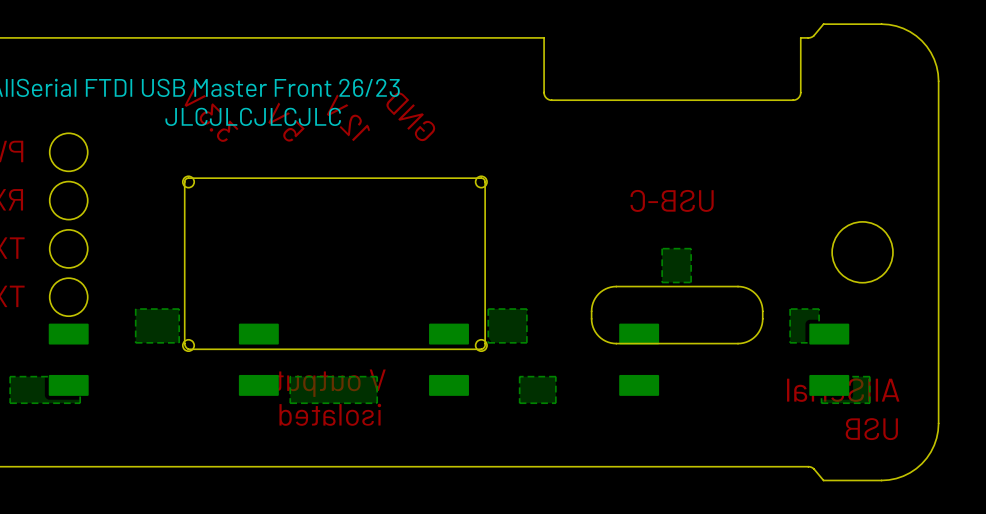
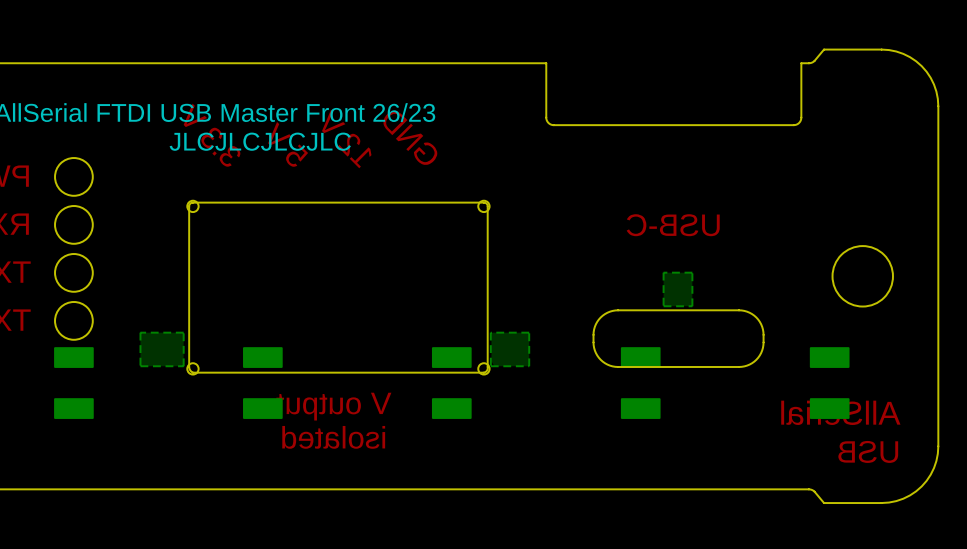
bottom zone outline: (819, 309) (790, 309) (790, 342) (819, 342) (819, 309) -> none
bottom zone outline: (80, 376) (10, 376) (10, 403) (80, 403) (80, 376) -> none
bottom zone outline: (377, 376) (290, 376) (290, 403) (377, 403) (377, 376) -> none
bottom zone outline: (555, 376) (555, 403) (519, 403) (519, 376) (555, 376) -> none
bottom zone outline: (869, 376) (821, 376) (821, 403) (869, 403) (869, 376) -> none

